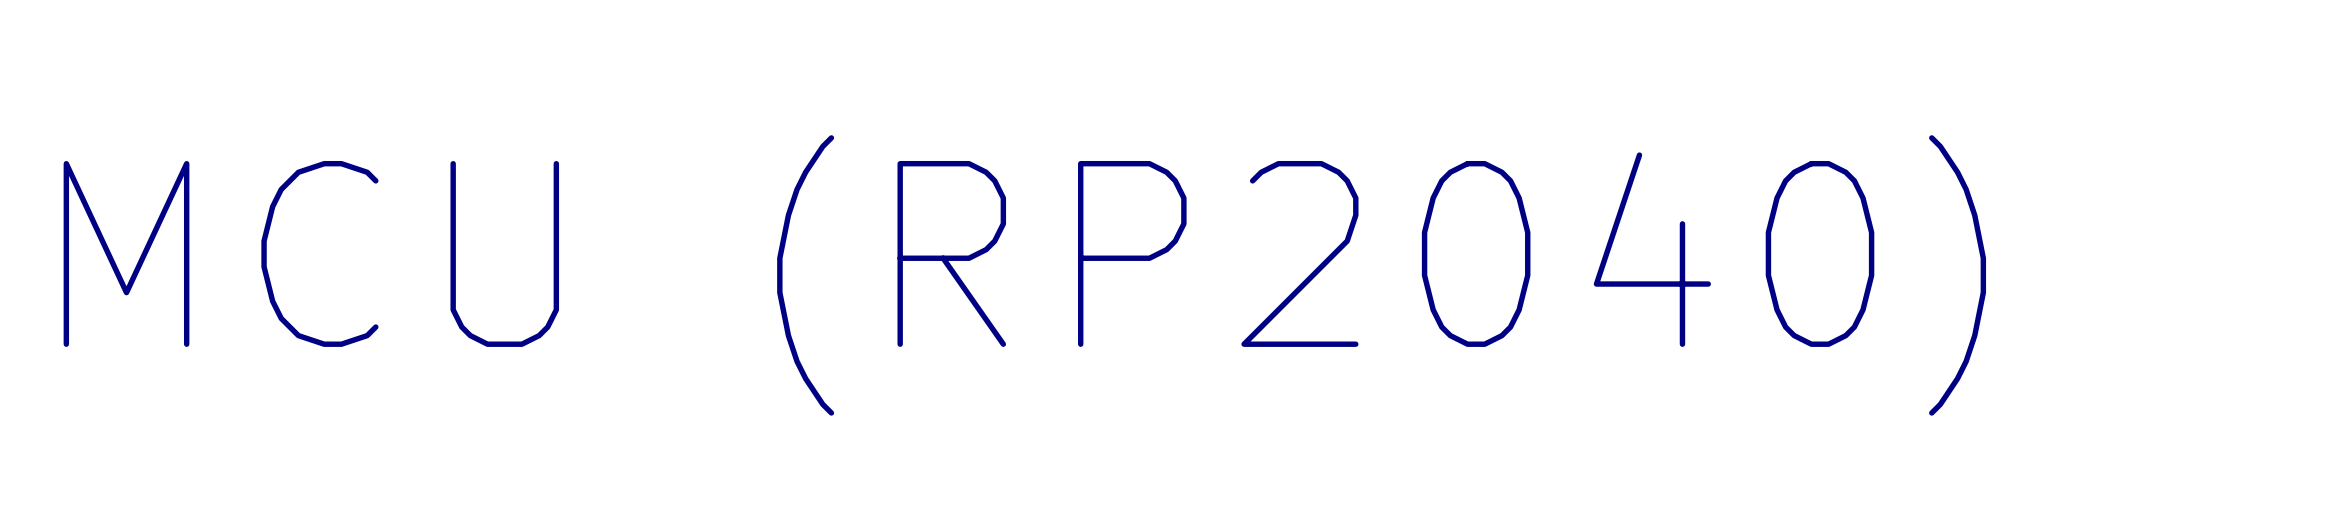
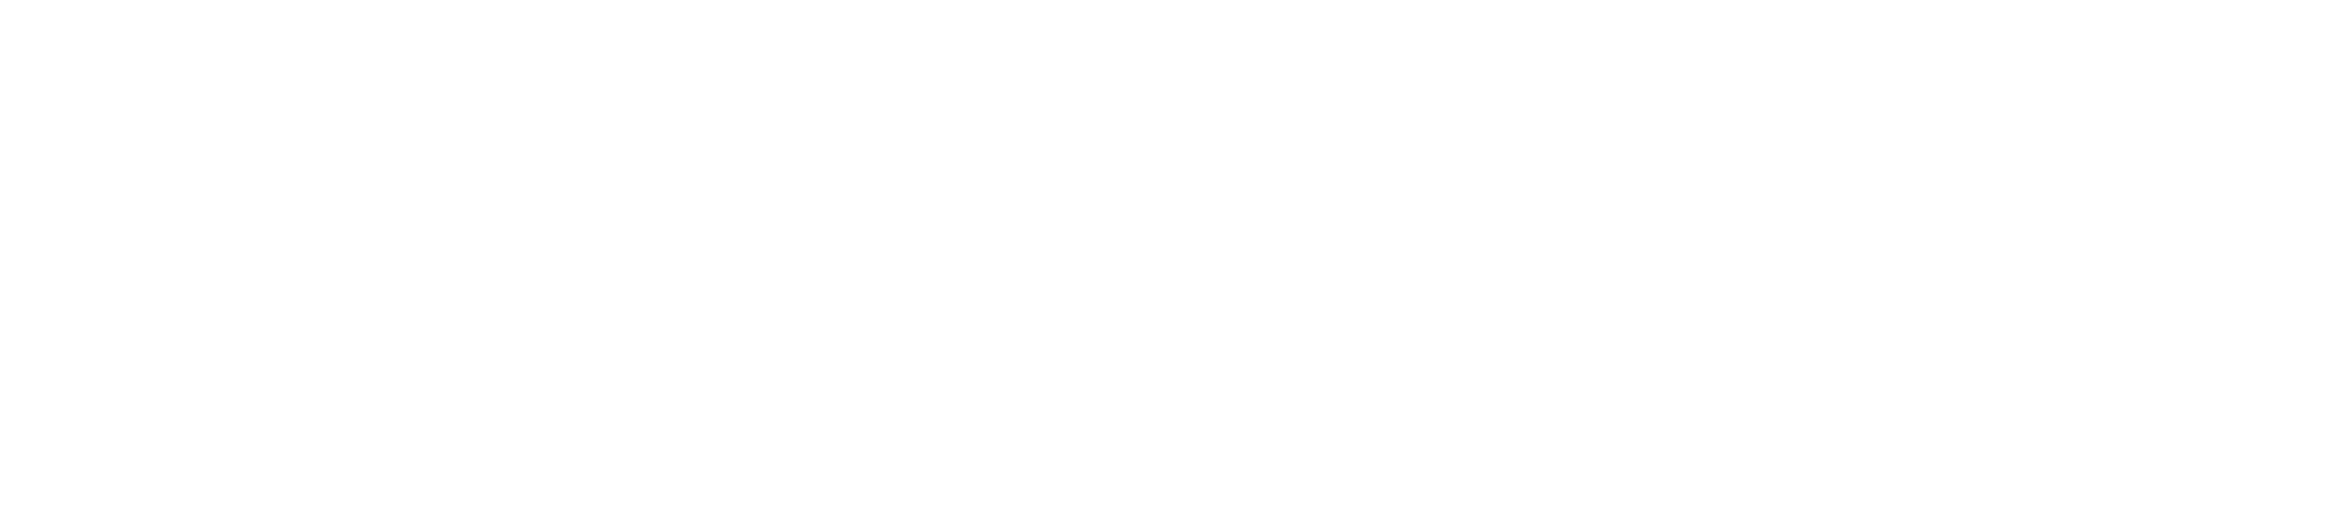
text: MCU (RP2040) (1024, 275) -> none

